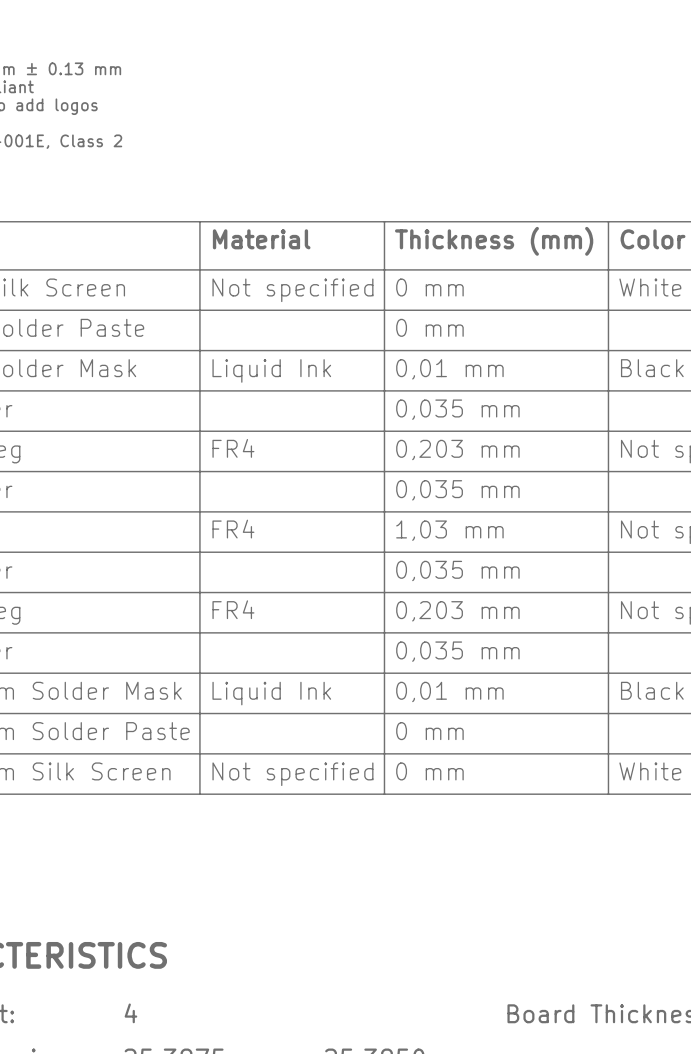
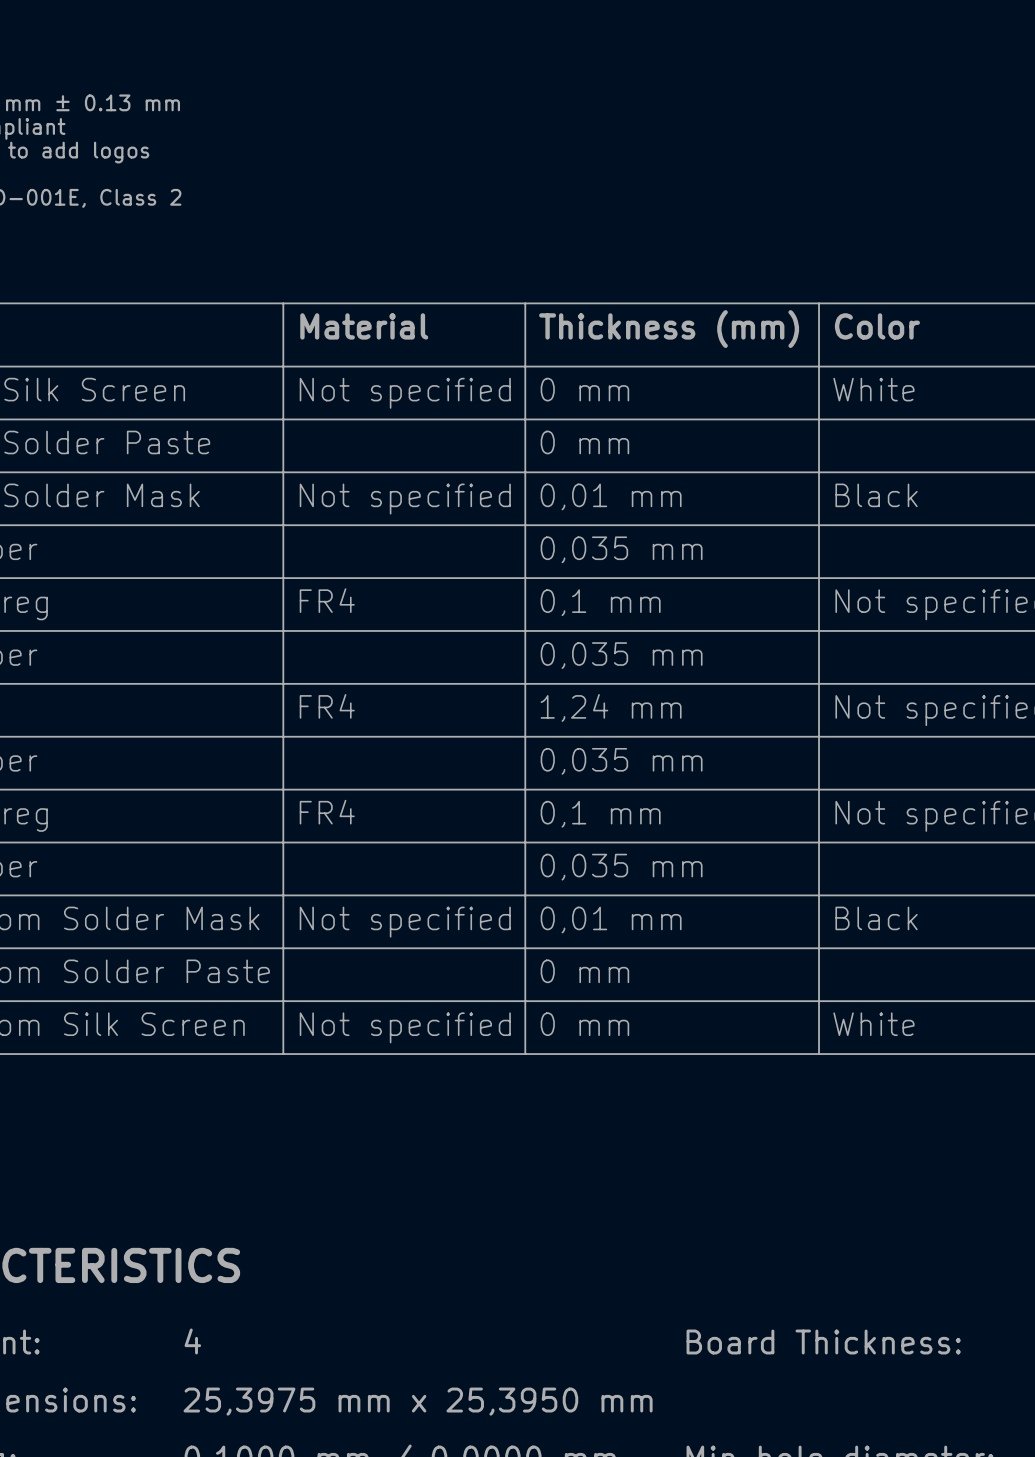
text: Liquid Ink (271, 370) -> Not specified (405, 499)
text: 0,203 mm (457, 450) -> 0,1 mm (600, 602)
text: 1,03 mm (449, 530) -> 1,24 mm (611, 707)
text: 0,203 mm (457, 611) -> 0,1 mm (600, 814)
text: Liquid Ink (271, 693) -> Not specified (405, 922)

